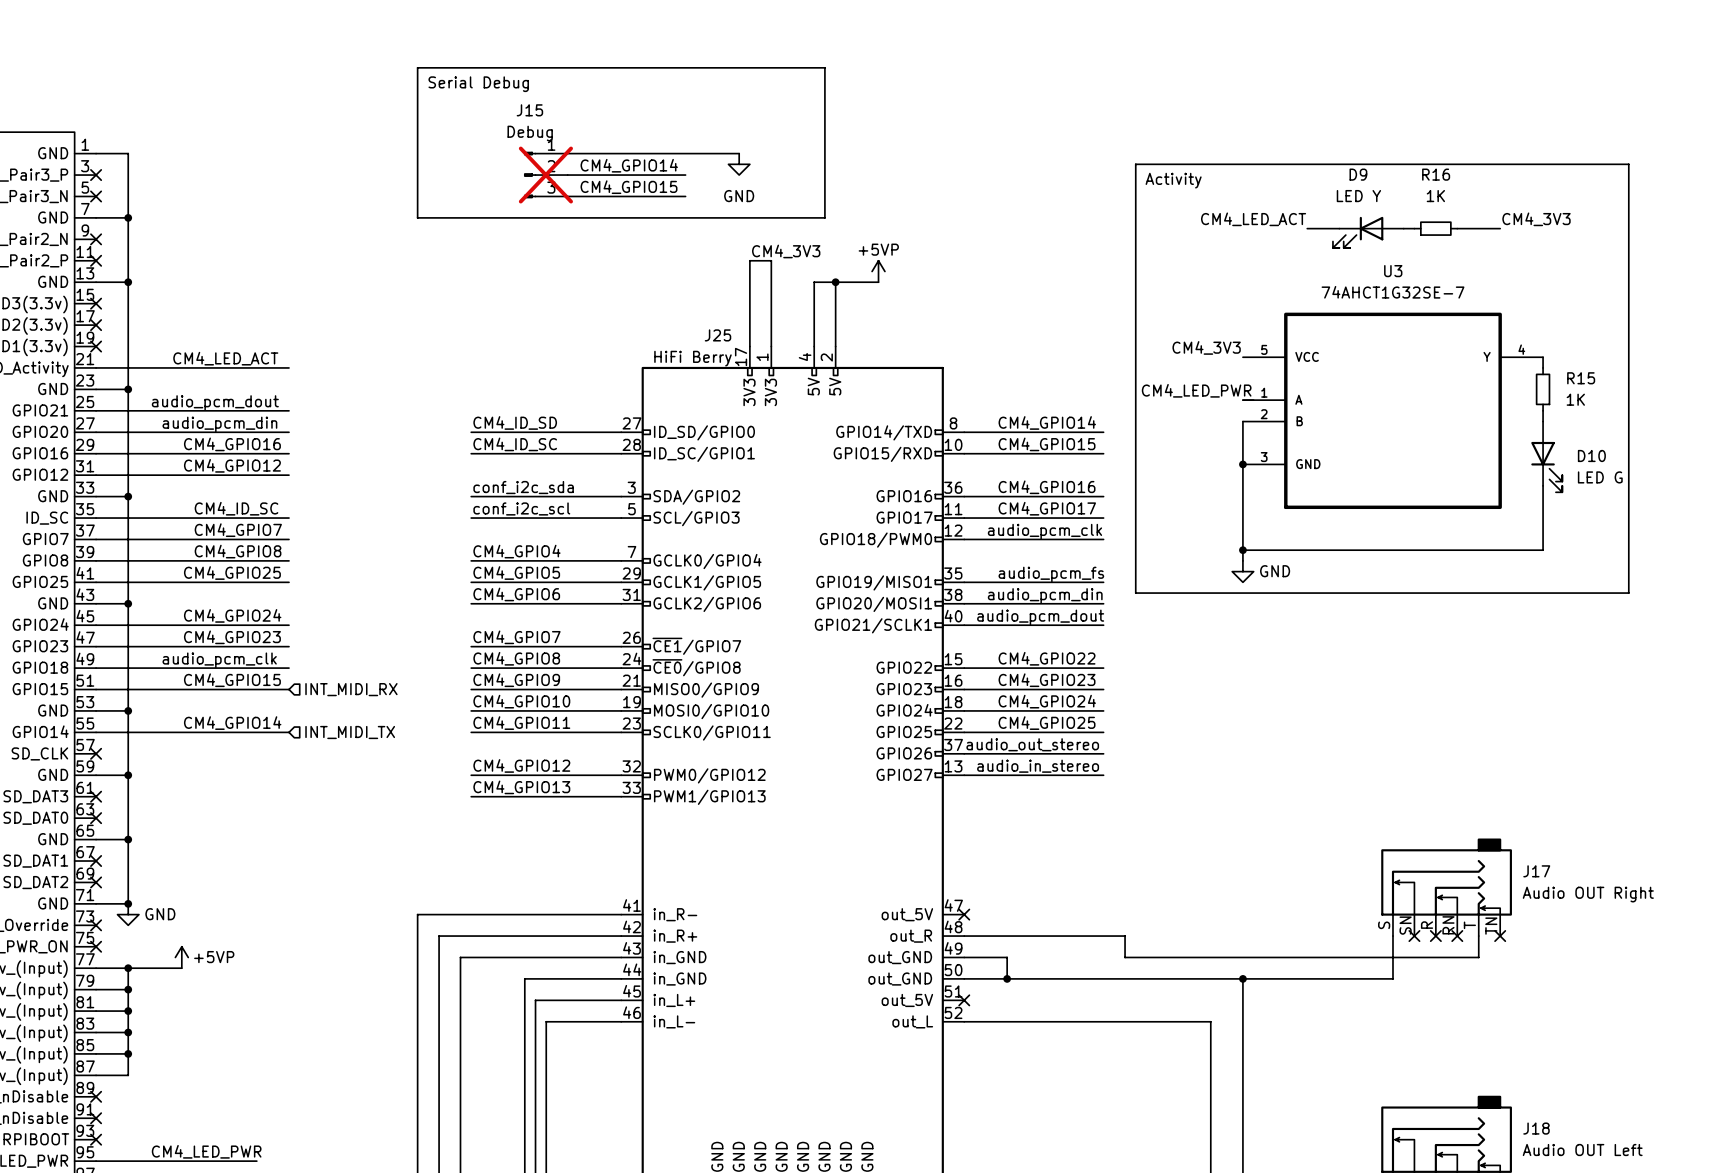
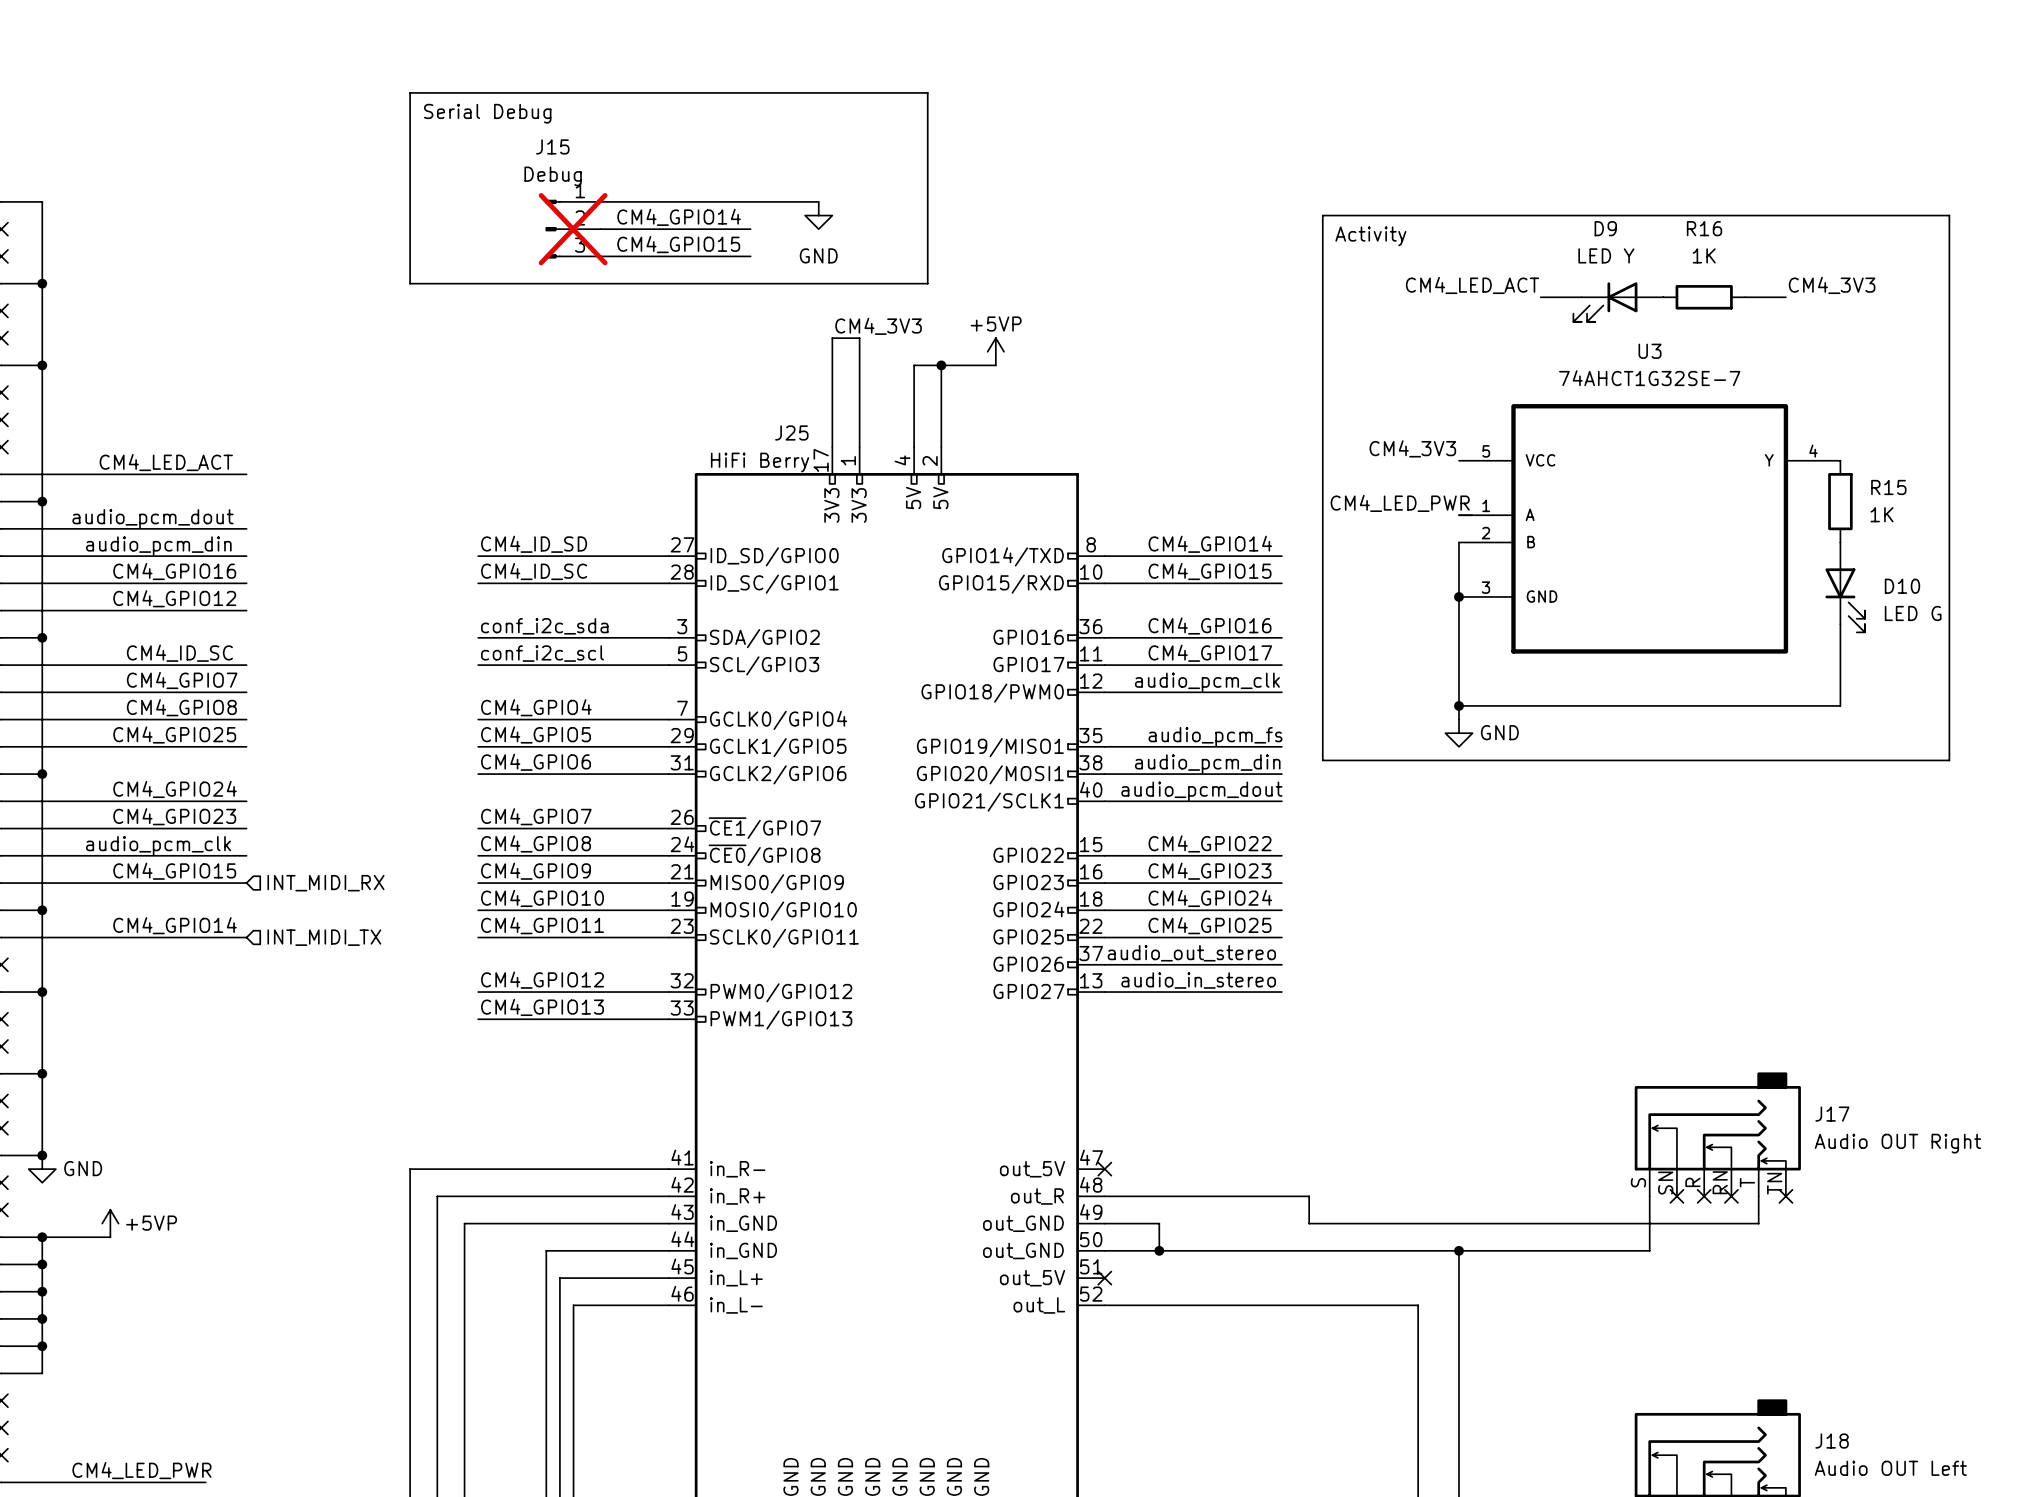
R16 symbol: [1414, 221, 1458, 236] -> [1663, 285, 1746, 310]
R15 symbol: [1535, 367, 1551, 411] -> [1828, 460, 1853, 543]

